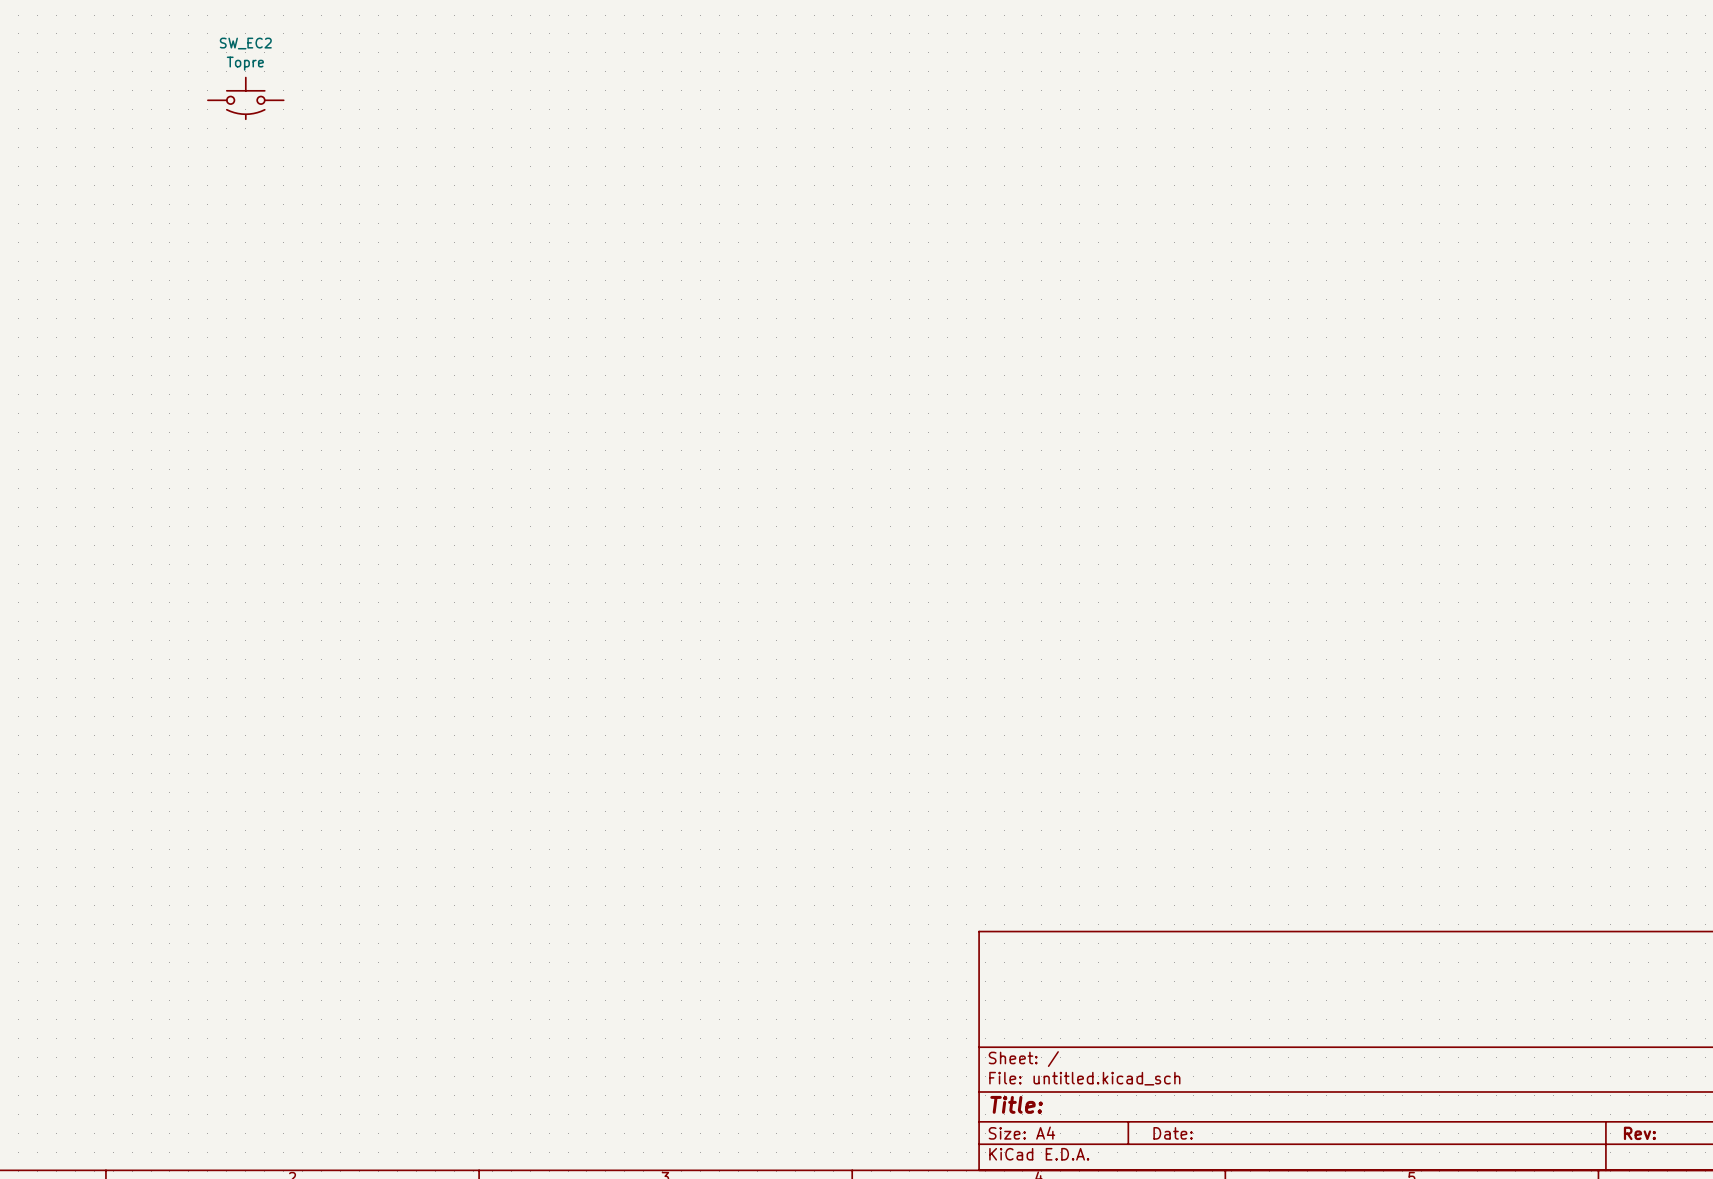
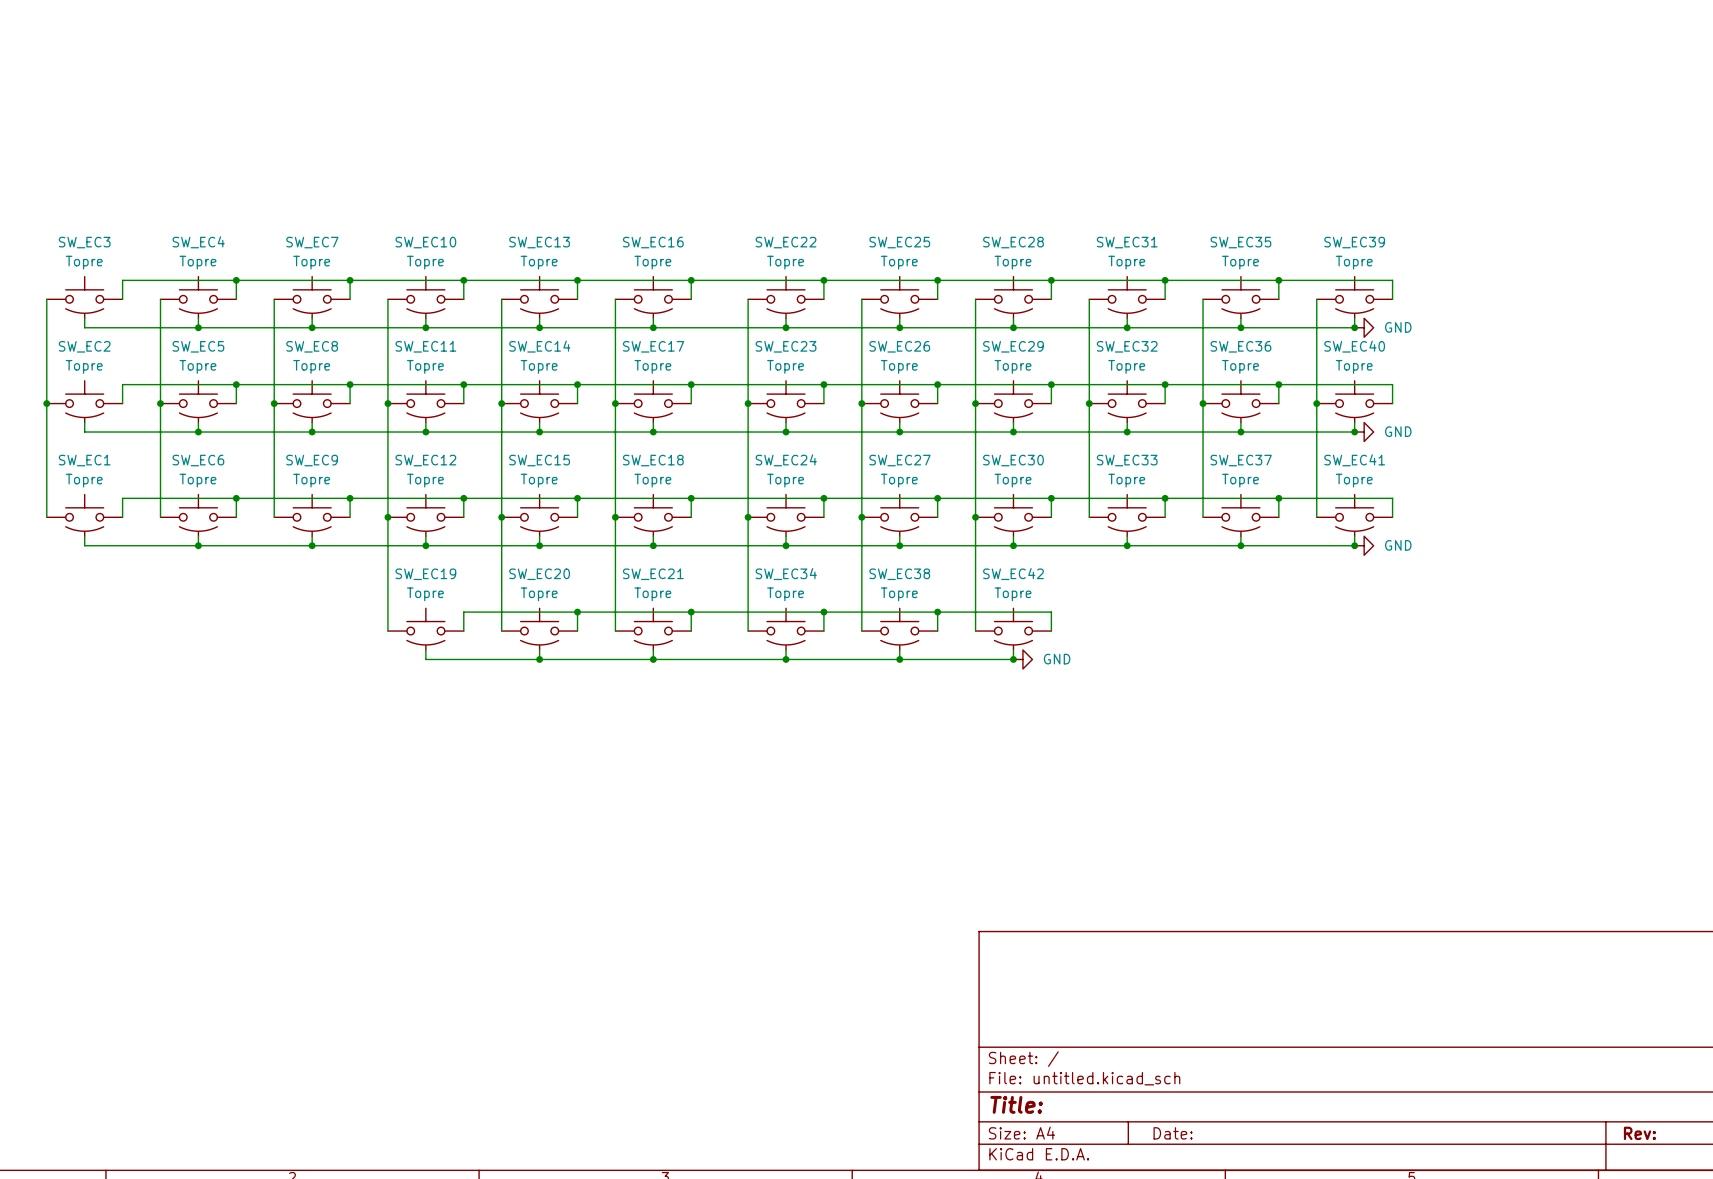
SW_EC2 position: (245, 98) -> (84, 401)
wire: none -> (236, 280) (236, 299)
junction: none -> (236, 280)
wire: none -> (350, 280) (350, 299)
junction: none -> (350, 280)
wire: none -> (463, 280) (463, 299)
junction: none -> (463, 280)
wire: none -> (577, 280) (577, 299)
junction: none -> (577, 280)
wire: none -> (691, 280) (691, 299)
junction: none -> (691, 280)
wire: none -> (823, 280) (823, 299)
junction: none -> (823, 280)
wire: none -> (937, 280) (937, 299)
junction: none -> (937, 280)
wire: none -> (1051, 280) (1051, 299)
junction: none -> (1051, 280)
wire: none -> (1165, 280) (1165, 299)
junction: none -> (1165, 280)
wire: none -> (1278, 280) (1278, 299)
junction: none -> (1278, 280)
SW_EC3: none -> Topre (84, 297)
SW_EC4: none -> Topre (198, 297)
SW_EC7: none -> Topre (312, 297)
SW_EC10: none -> Topre (425, 297)
SW_EC13: none -> Topre (539, 297)
SW_EC16: none -> Topre (653, 297)
SW_EC22: none -> Topre (786, 297)
SW_EC25: none -> Topre (899, 297)
SW_EC28: none -> Topre (1013, 297)
SW_EC31: none -> Topre (1127, 297)
SW_EC35: none -> Topre (1240, 297)
SW_EC39: none -> Topre (1354, 297)
wire: none -> (46, 299) (46, 517)
wire: none -> (122, 299) (122, 280) (1392, 280) (1392, 299)
wire: none -> (160, 299) (160, 517)
wire: none -> (274, 299) (274, 517)
wire: none -> (387, 299) (387, 631)
wire: none -> (501, 299) (501, 631)
wire: none -> (615, 299) (615, 631)
wire: none -> (748, 299) (748, 631)
wire: none -> (861, 299) (861, 631)
wire: none -> (975, 299) (975, 631)
wire: none -> (1089, 299) (1089, 517)
wire: none -> (1203, 299) (1203, 517)
wire: none -> (1316, 299) (1316, 517)
wire: none -> (84, 318) (84, 327) (1354, 327) (1354, 318)
wire: none -> (198, 318) (198, 327)
wire: none -> (312, 318) (312, 327)
wire: none -> (425, 318) (425, 327)
wire: none -> (539, 318) (539, 327)
wire: none -> (653, 318) (653, 327)
wire: none -> (786, 318) (786, 327)
wire: none -> (899, 318) (899, 327)
wire: none -> (1013, 318) (1013, 327)
wire: none -> (1127, 318) (1127, 327)
wire: none -> (1240, 318) (1240, 327)
junction: none -> (198, 327)
junction: none -> (312, 327)
junction: none -> (425, 327)
junction: none -> (539, 327)
junction: none -> (653, 327)
junction: none -> (786, 327)
junction: none -> (899, 327)
junction: none -> (1013, 327)
junction: none -> (1127, 327)
junction: none -> (1240, 327)
junction: none -> (1354, 327)
power symbol: none -> GND (1364, 327)
wire: none -> (236, 384) (236, 403)
junction: none -> (236, 384)
wire: none -> (350, 384) (350, 403)
junction: none -> (350, 384)
wire: none -> (463, 384) (463, 403)
junction: none -> (463, 384)
wire: none -> (577, 384) (577, 403)
junction: none -> (577, 384)
wire: none -> (691, 384) (691, 403)
junction: none -> (691, 384)
wire: none -> (823, 384) (823, 403)
junction: none -> (823, 384)
wire: none -> (937, 384) (937, 403)
junction: none -> (937, 384)
wire: none -> (1051, 384) (1051, 403)
junction: none -> (1051, 384)
wire: none -> (1165, 384) (1165, 403)
junction: none -> (1165, 384)
wire: none -> (1278, 384) (1278, 403)
junction: none -> (1278, 384)
SW_EC5: none -> Topre (198, 401)
SW_EC8: none -> Topre (312, 401)
SW_EC11: none -> Topre (425, 401)
SW_EC14: none -> Topre (539, 401)
SW_EC17: none -> Topre (653, 401)
SW_EC23: none -> Topre (786, 401)
SW_EC26: none -> Topre (899, 401)
SW_EC29: none -> Topre (1013, 401)
SW_EC32: none -> Topre (1127, 401)
SW_EC36: none -> Topre (1240, 401)
SW_EC40: none -> Topre (1354, 401)
junction: none -> (46, 403)
wire: none -> (122, 403) (122, 384) (1392, 384) (1392, 403)
junction: none -> (160, 403)
junction: none -> (274, 403)
junction: none -> (387, 403)
junction: none -> (501, 403)
junction: none -> (615, 403)
junction: none -> (748, 403)
junction: none -> (861, 403)
junction: none -> (975, 403)
junction: none -> (1089, 403)
junction: none -> (1203, 403)
junction: none -> (1316, 403)
wire: none -> (84, 422) (84, 432) (1354, 432) (1354, 422)
wire: none -> (198, 422) (198, 432)
wire: none -> (312, 422) (312, 432)
wire: none -> (425, 422) (425, 432)
wire: none -> (539, 422) (539, 432)
wire: none -> (653, 422) (653, 432)
wire: none -> (786, 422) (786, 432)
wire: none -> (899, 422) (899, 432)
wire: none -> (1013, 422) (1013, 432)
wire: none -> (1127, 422) (1127, 432)
wire: none -> (1240, 422) (1240, 432)
junction: none -> (198, 432)
junction: none -> (312, 432)
junction: none -> (425, 432)
junction: none -> (539, 432)
junction: none -> (653, 432)
junction: none -> (786, 432)
junction: none -> (899, 432)
junction: none -> (1013, 432)
junction: none -> (1127, 432)
junction: none -> (1240, 432)
junction: none -> (1354, 432)
power symbol: none -> GND (1364, 432)
wire: none -> (236, 498) (236, 517)
junction: none -> (236, 498)
wire: none -> (350, 498) (350, 517)
junction: none -> (350, 498)
wire: none -> (463, 498) (463, 517)
junction: none -> (463, 498)
wire: none -> (577, 498) (577, 517)
junction: none -> (577, 498)
wire: none -> (691, 498) (691, 517)
junction: none -> (691, 498)
wire: none -> (823, 498) (823, 517)
junction: none -> (823, 498)
wire: none -> (937, 498) (937, 517)
junction: none -> (937, 498)
wire: none -> (1051, 498) (1051, 517)
junction: none -> (1051, 498)
wire: none -> (1165, 498) (1165, 517)
junction: none -> (1165, 498)
wire: none -> (1278, 498) (1278, 517)
junction: none -> (1278, 498)
SW_EC1: none -> Topre (84, 515)
SW_EC6: none -> Topre (198, 515)
SW_EC9: none -> Topre (312, 515)
SW_EC12: none -> Topre (425, 515)
SW_EC15: none -> Topre (539, 515)
SW_EC18: none -> Topre (653, 515)
SW_EC24: none -> Topre (786, 515)
SW_EC27: none -> Topre (899, 515)
SW_EC30: none -> Topre (1013, 515)
SW_EC33: none -> Topre (1127, 515)
SW_EC37: none -> Topre (1240, 515)
SW_EC41: none -> Topre (1354, 515)
wire: none -> (122, 517) (122, 498) (1392, 498) (1392, 517)
junction: none -> (387, 517)
junction: none -> (501, 517)
junction: none -> (615, 517)
junction: none -> (748, 517)
junction: none -> (861, 517)
junction: none -> (975, 517)
wire: none -> (84, 536) (84, 545) (1354, 545) (1354, 536)
wire: none -> (198, 536) (198, 545)
wire: none -> (312, 536) (312, 545)
wire: none -> (425, 536) (425, 545)
wire: none -> (539, 536) (539, 545)
wire: none -> (653, 536) (653, 545)
wire: none -> (786, 536) (786, 545)
wire: none -> (899, 536) (899, 545)
wire: none -> (1013, 536) (1013, 545)
wire: none -> (1127, 536) (1127, 545)
wire: none -> (1240, 536) (1240, 545)
junction: none -> (198, 545)
junction: none -> (312, 545)
junction: none -> (425, 545)
junction: none -> (539, 545)
junction: none -> (653, 545)
junction: none -> (786, 545)
junction: none -> (899, 545)
junction: none -> (1013, 545)
junction: none -> (1127, 545)
junction: none -> (1240, 545)
junction: none -> (1354, 545)
power symbol: none -> GND (1364, 545)
wire: none -> (577, 612) (577, 631)
junction: none -> (577, 612)
wire: none -> (691, 612) (691, 631)
junction: none -> (691, 612)
wire: none -> (823, 612) (823, 631)
junction: none -> (823, 612)
wire: none -> (937, 612) (937, 631)
junction: none -> (937, 612)
SW_EC19: none -> Topre (425, 629)
SW_EC20: none -> Topre (539, 629)
SW_EC21: none -> Topre (653, 629)
SW_EC34: none -> Topre (786, 629)
SW_EC38: none -> Topre (899, 629)
SW_EC42: none -> Topre (1013, 629)
wire: none -> (463, 631) (463, 612) (1051, 612) (1051, 631)
wire: none -> (425, 649) (425, 659) (1013, 659) (1013, 649)
wire: none -> (539, 649) (539, 659)
wire: none -> (653, 649) (653, 659)
wire: none -> (786, 649) (786, 659)
wire: none -> (899, 649) (899, 659)
junction: none -> (539, 659)
junction: none -> (653, 659)
junction: none -> (786, 659)
junction: none -> (899, 659)
junction: none -> (1013, 659)
power symbol: none -> GND (1022, 659)

